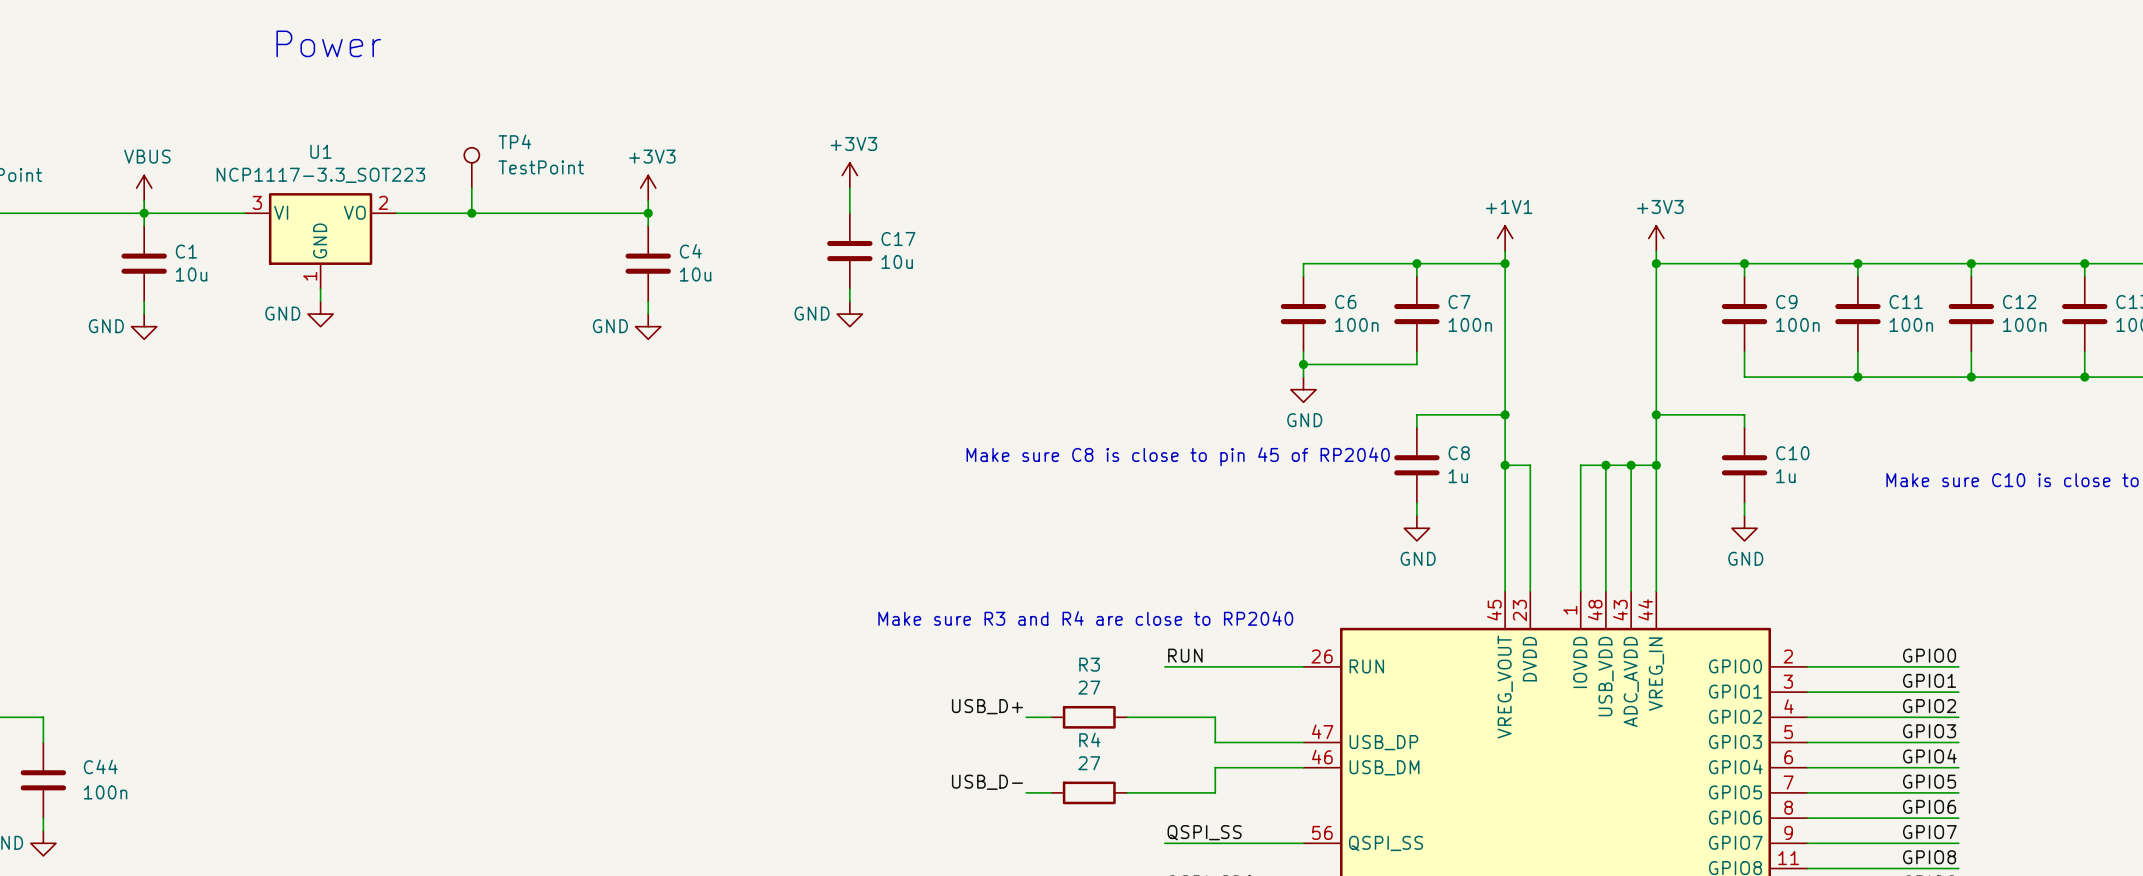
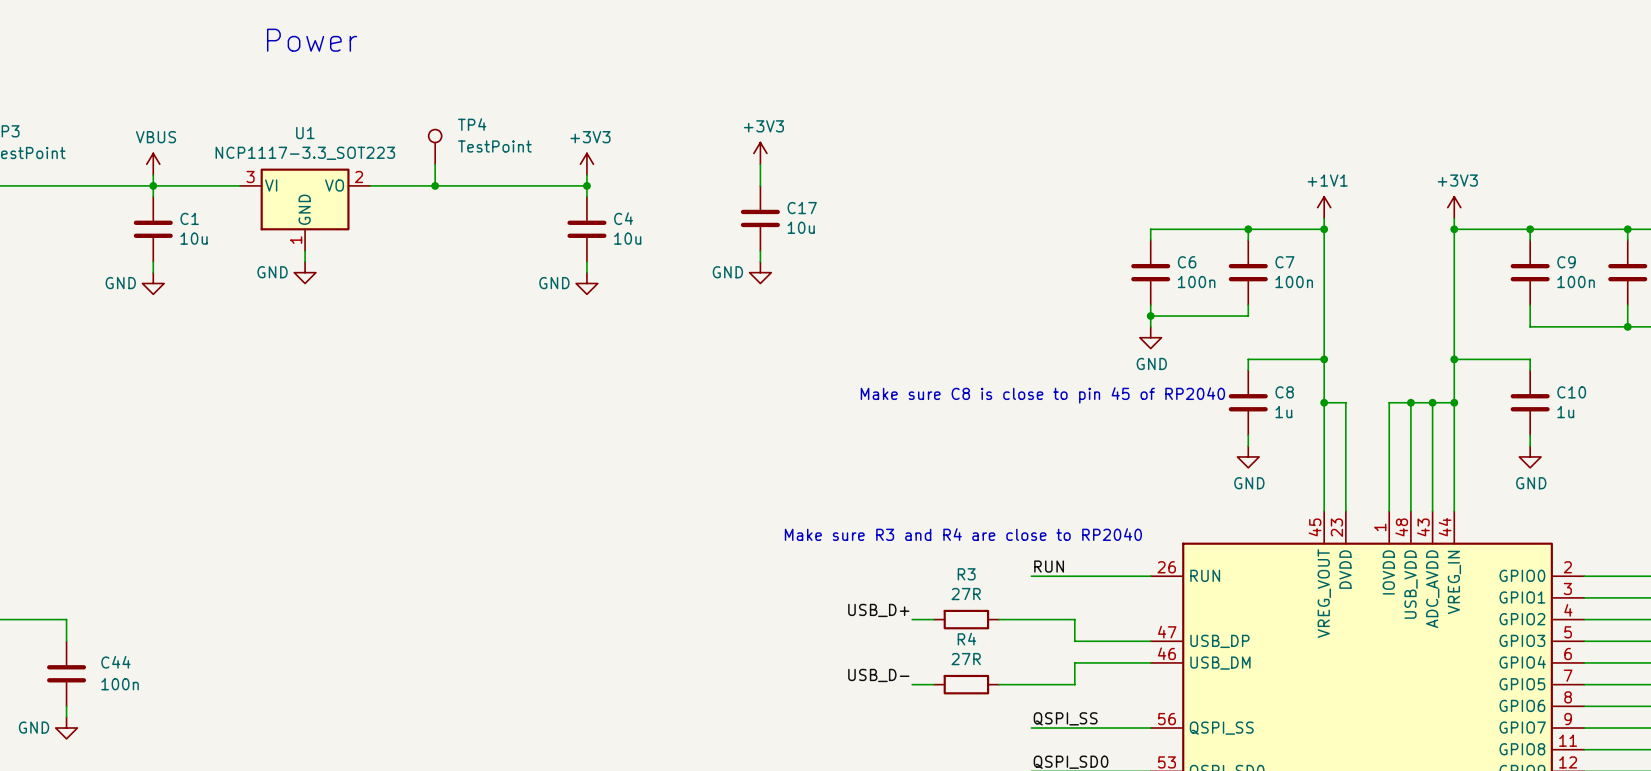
R3 value: 27 (1089, 687) -> 27R (966, 594)
R4 value: 27 (1089, 763) -> 27R (966, 659)

